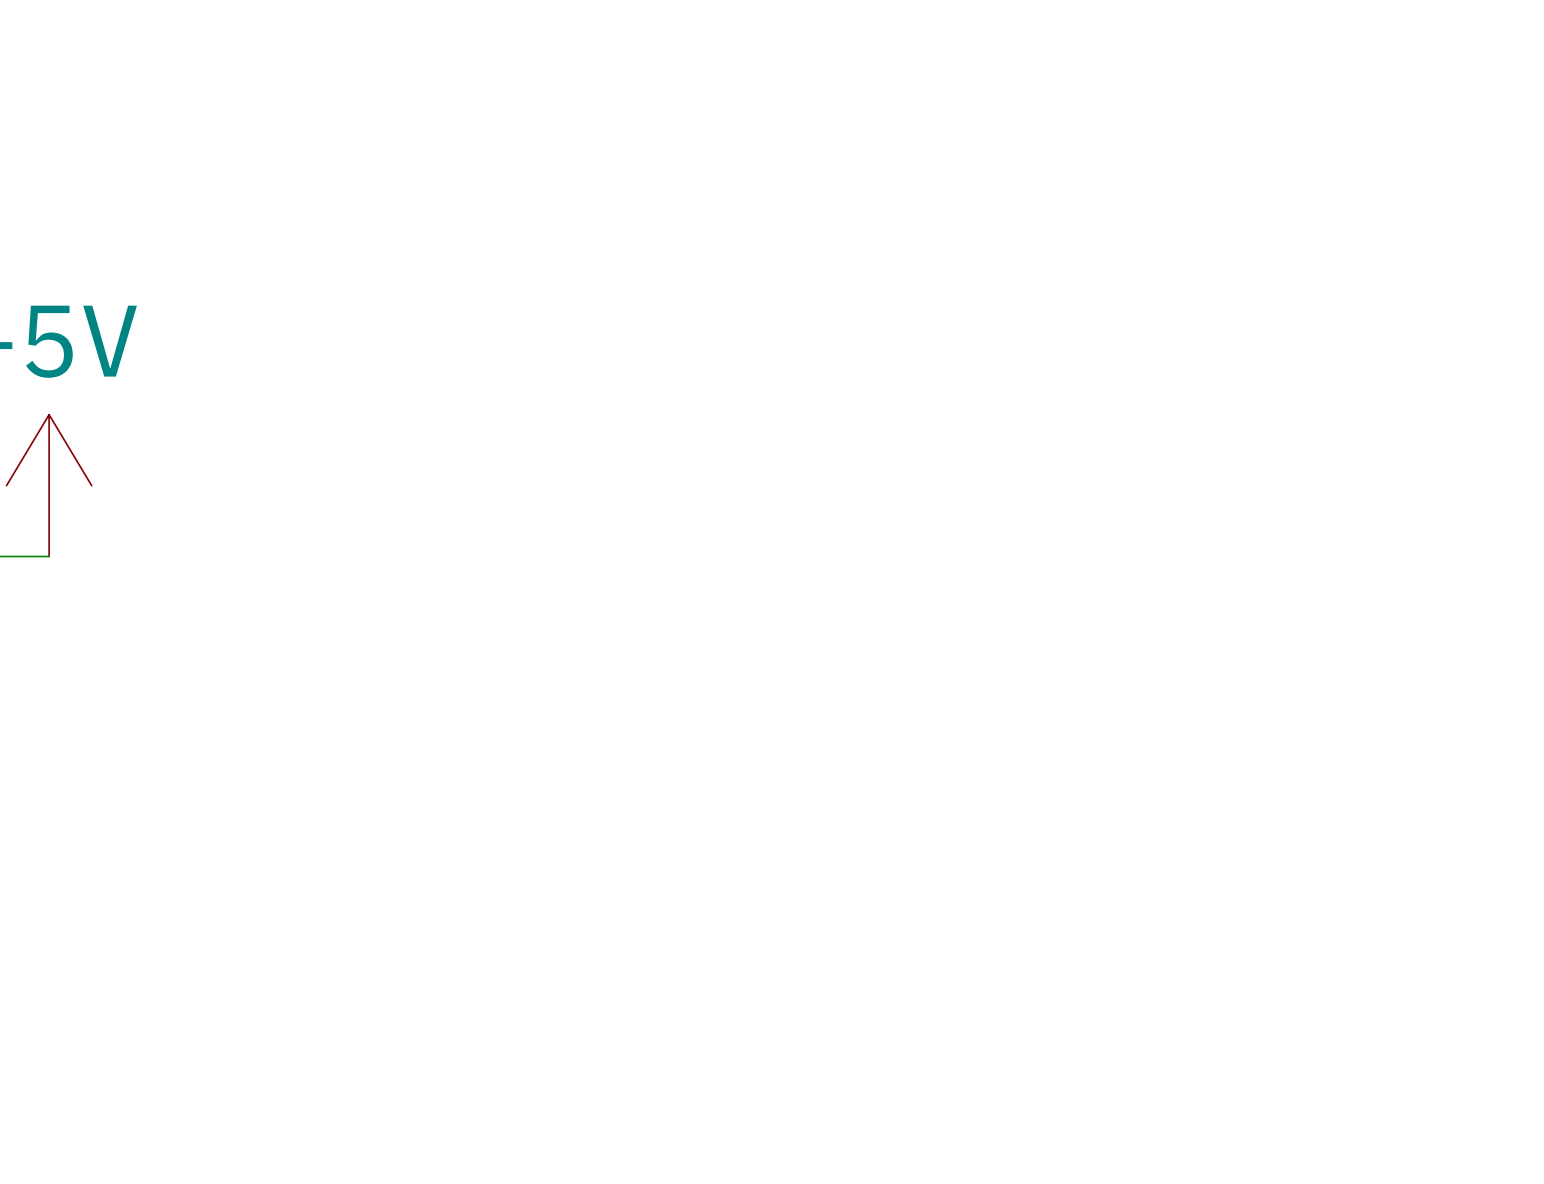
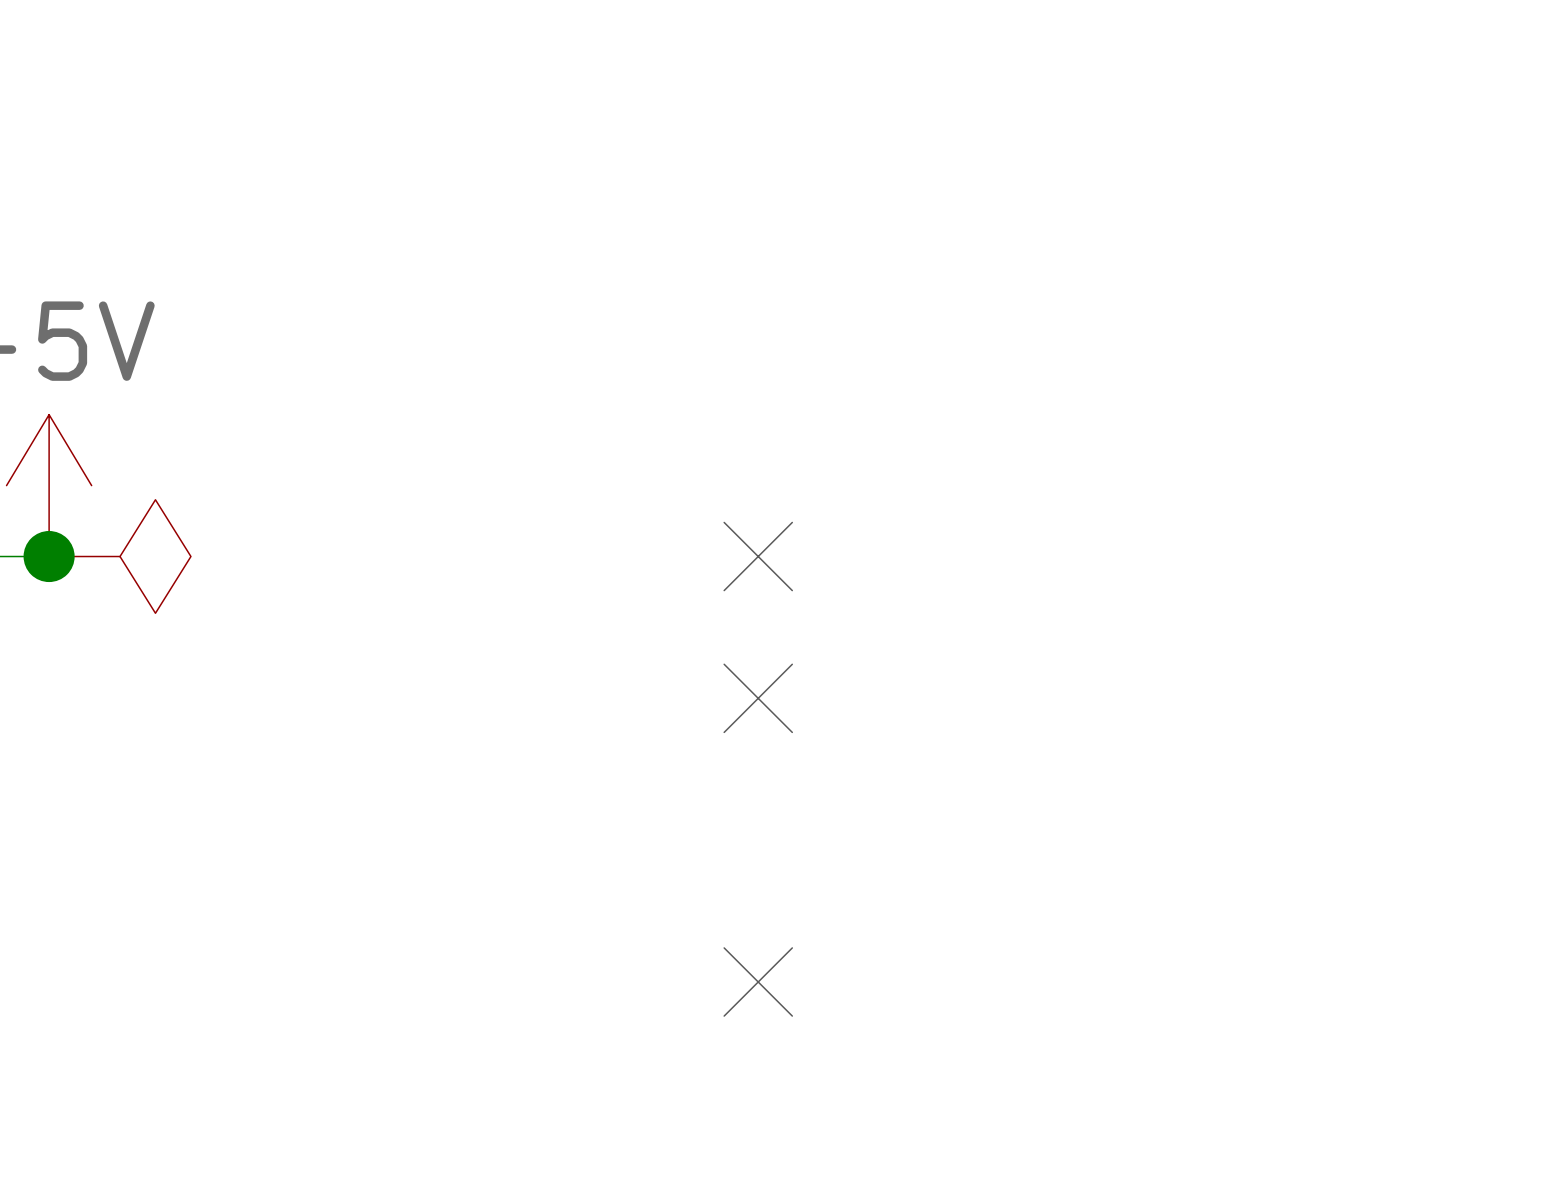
junction: none -> (49, 556)
power symbol: none -> (120, 556)
no-connect mark: none -> (758, 556)
no-connect mark: none -> (758, 698)
no-connect mark: none -> (758, 982)

